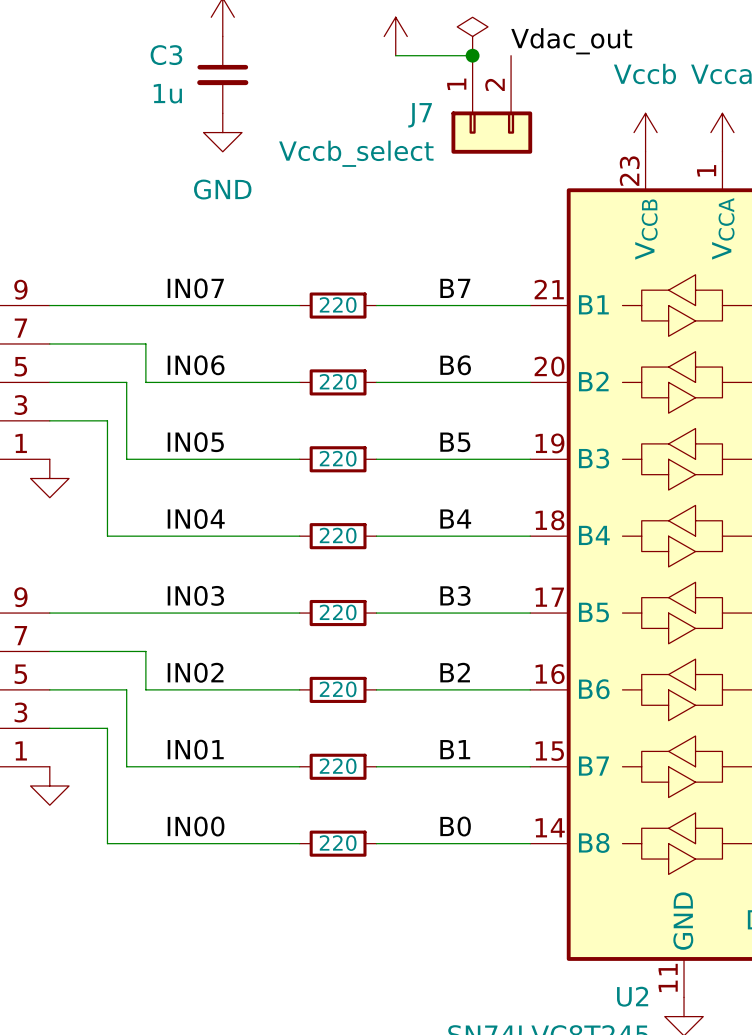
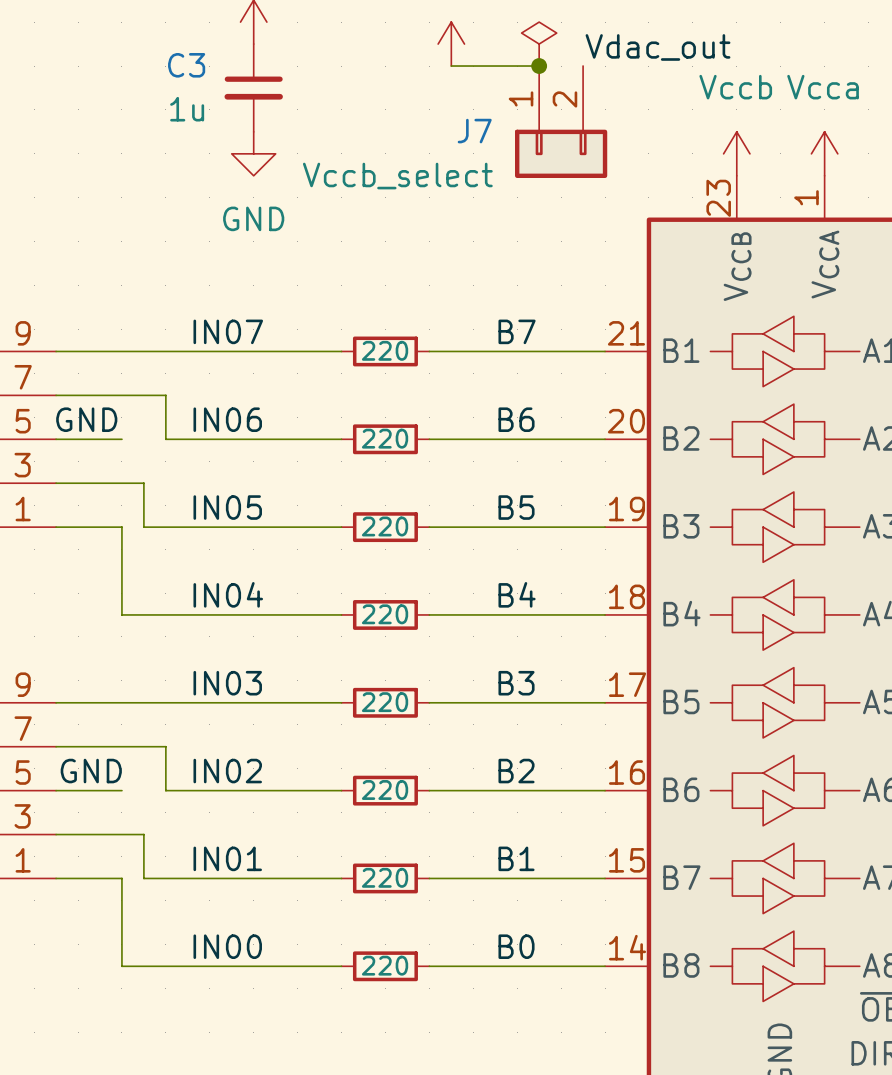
label: none -> GND (86, 419)
wire: (107, 382) (126, 382) (126, 420) -> (121, 483) (143, 483)
wire: (107, 420) (107, 459) -> (56, 527) (121, 527)
power symbol: (49, 478) -> none
label: none -> GND (91, 771)
wire: (107, 689) (126, 689) (126, 728) -> (121, 834) (143, 834)
wire: (107, 728) (107, 766) -> (56, 878) (121, 878)
power symbol: (49, 786) -> none

